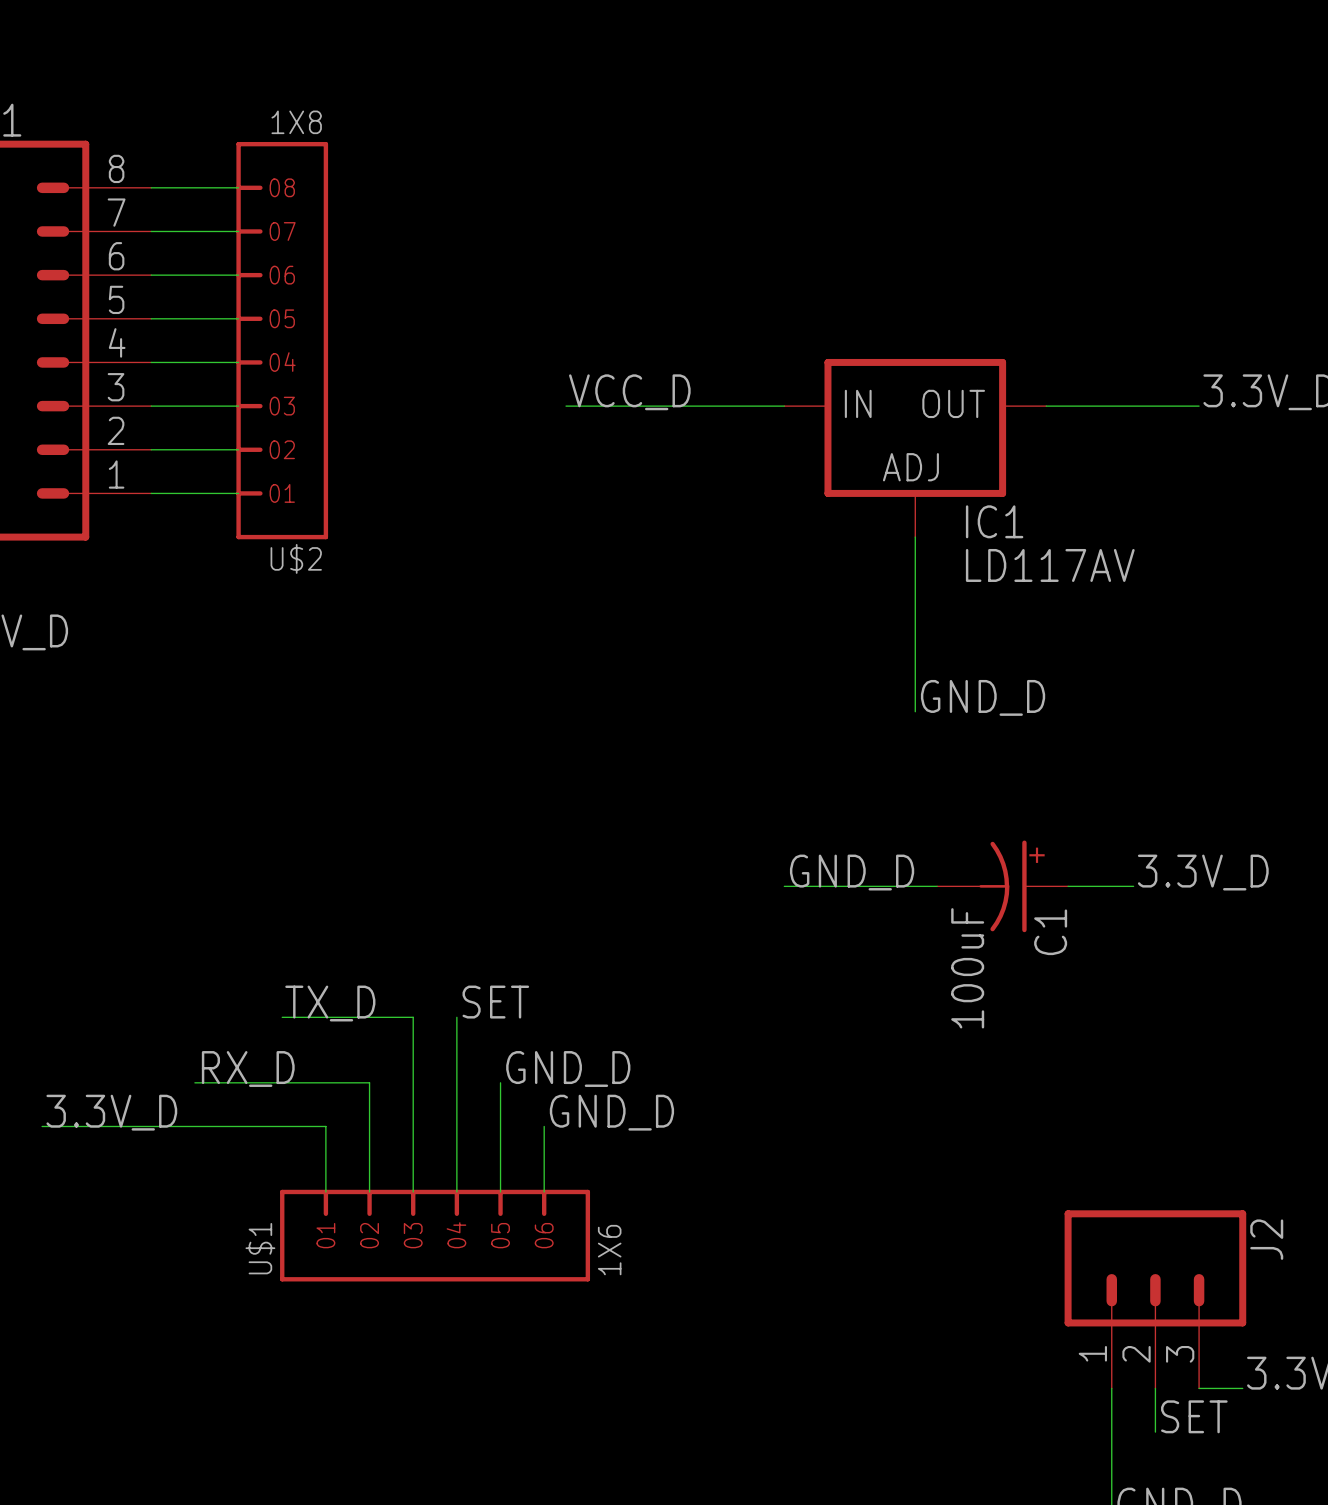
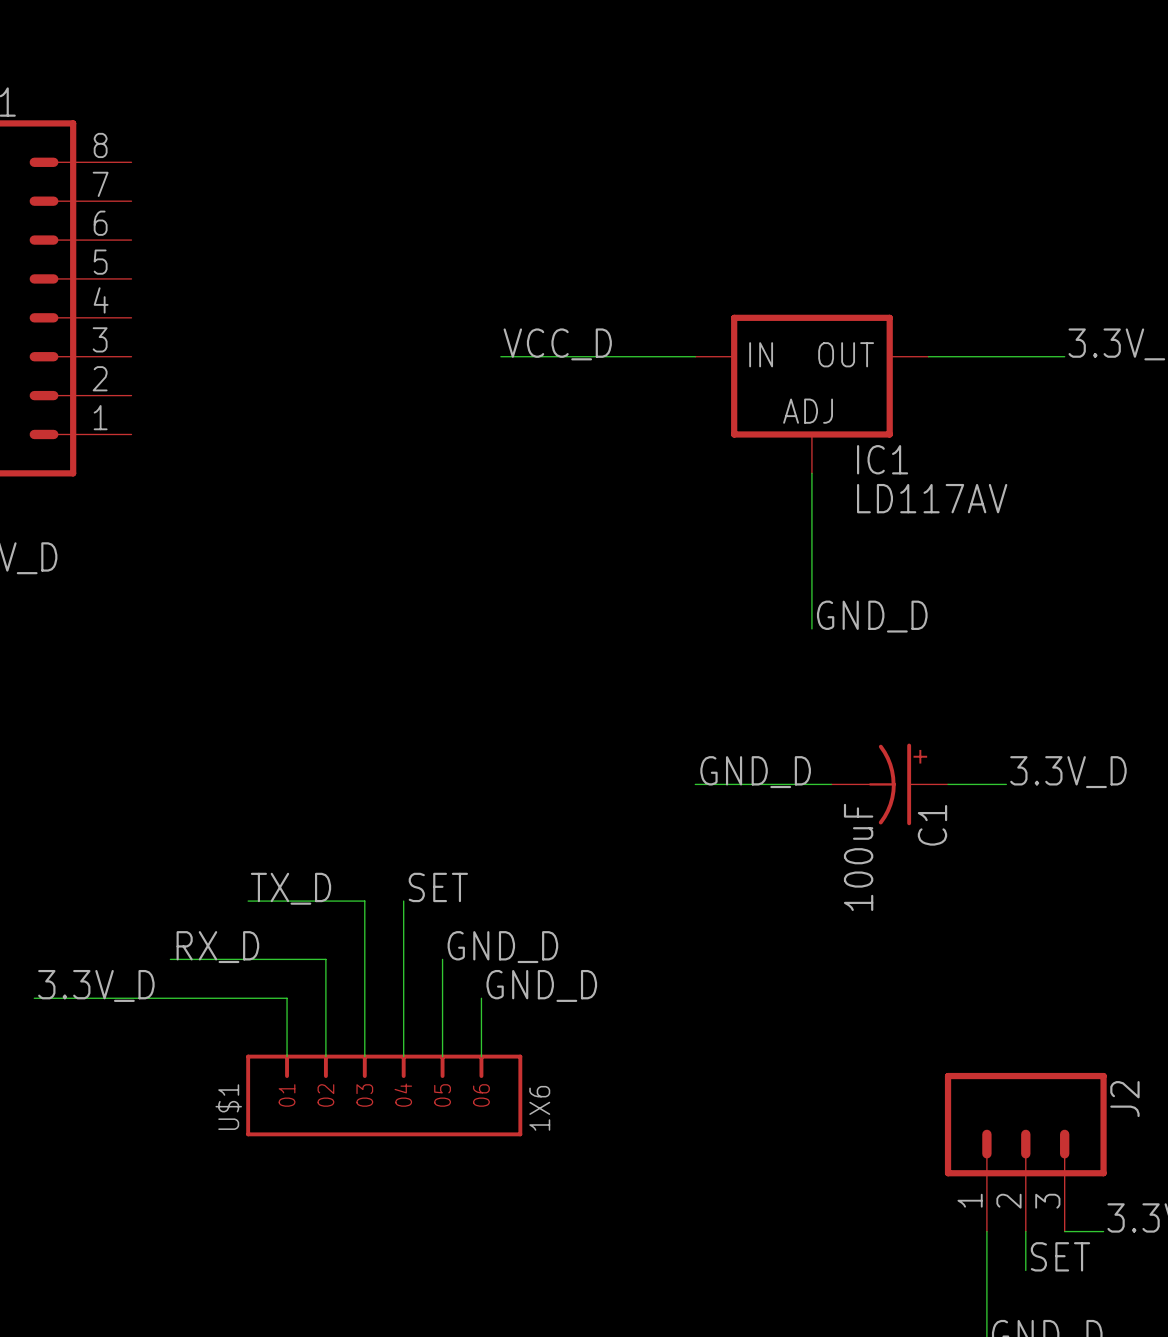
wire: (151, 187) (238, 187) -> none
wire: (151, 231) (238, 231) -> none
wire: (151, 275) (238, 275) -> none
wire: (151, 318) (238, 318) -> none
U$2: 1X8 (282, 340) -> none
wire: (151, 362) (238, 362) -> none
wire: (151, 406) (238, 406) -> none
wire: (151, 449) (238, 449) -> none
wire: (151, 493) (238, 493) -> none

